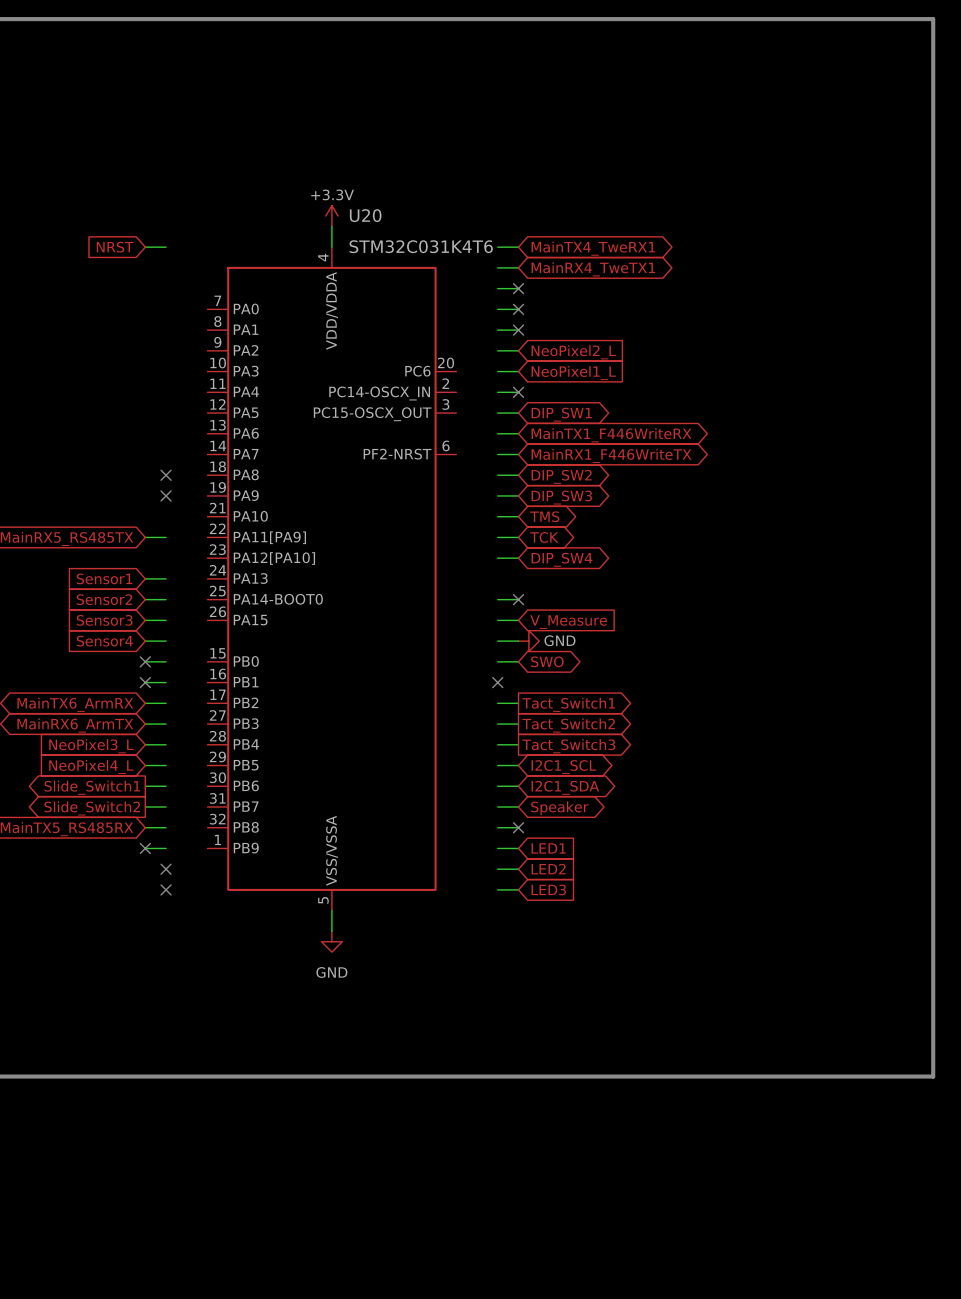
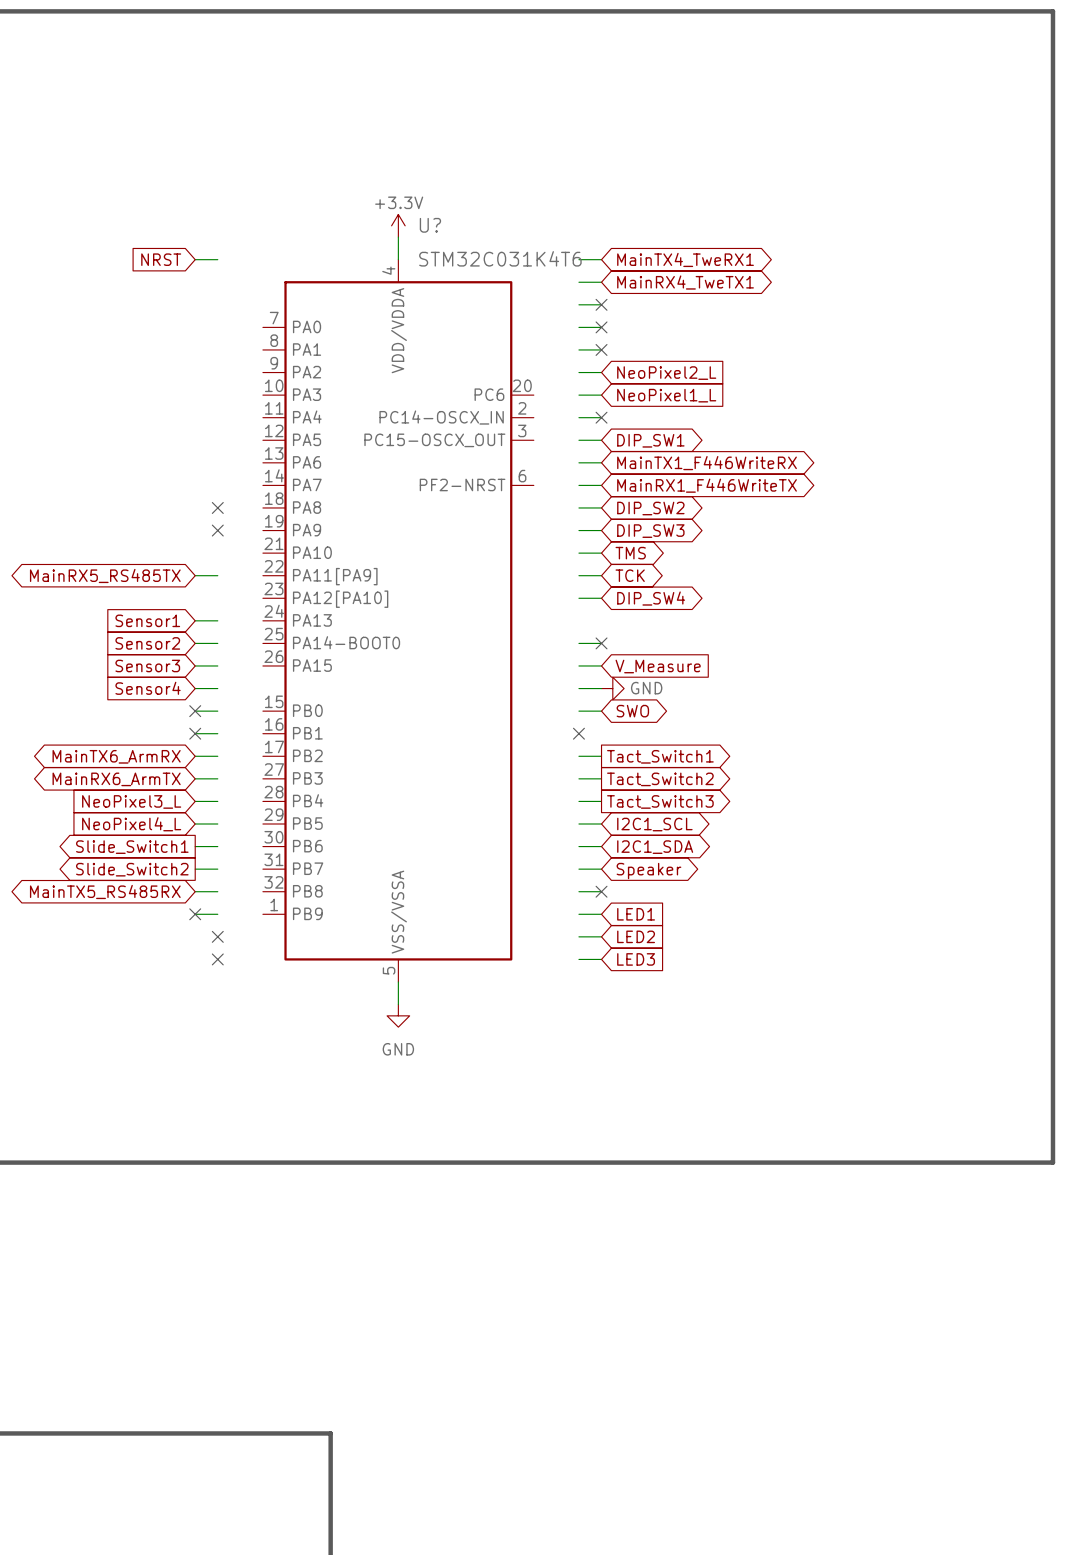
U20 name: U20 (365, 215) -> U? (430, 225)

